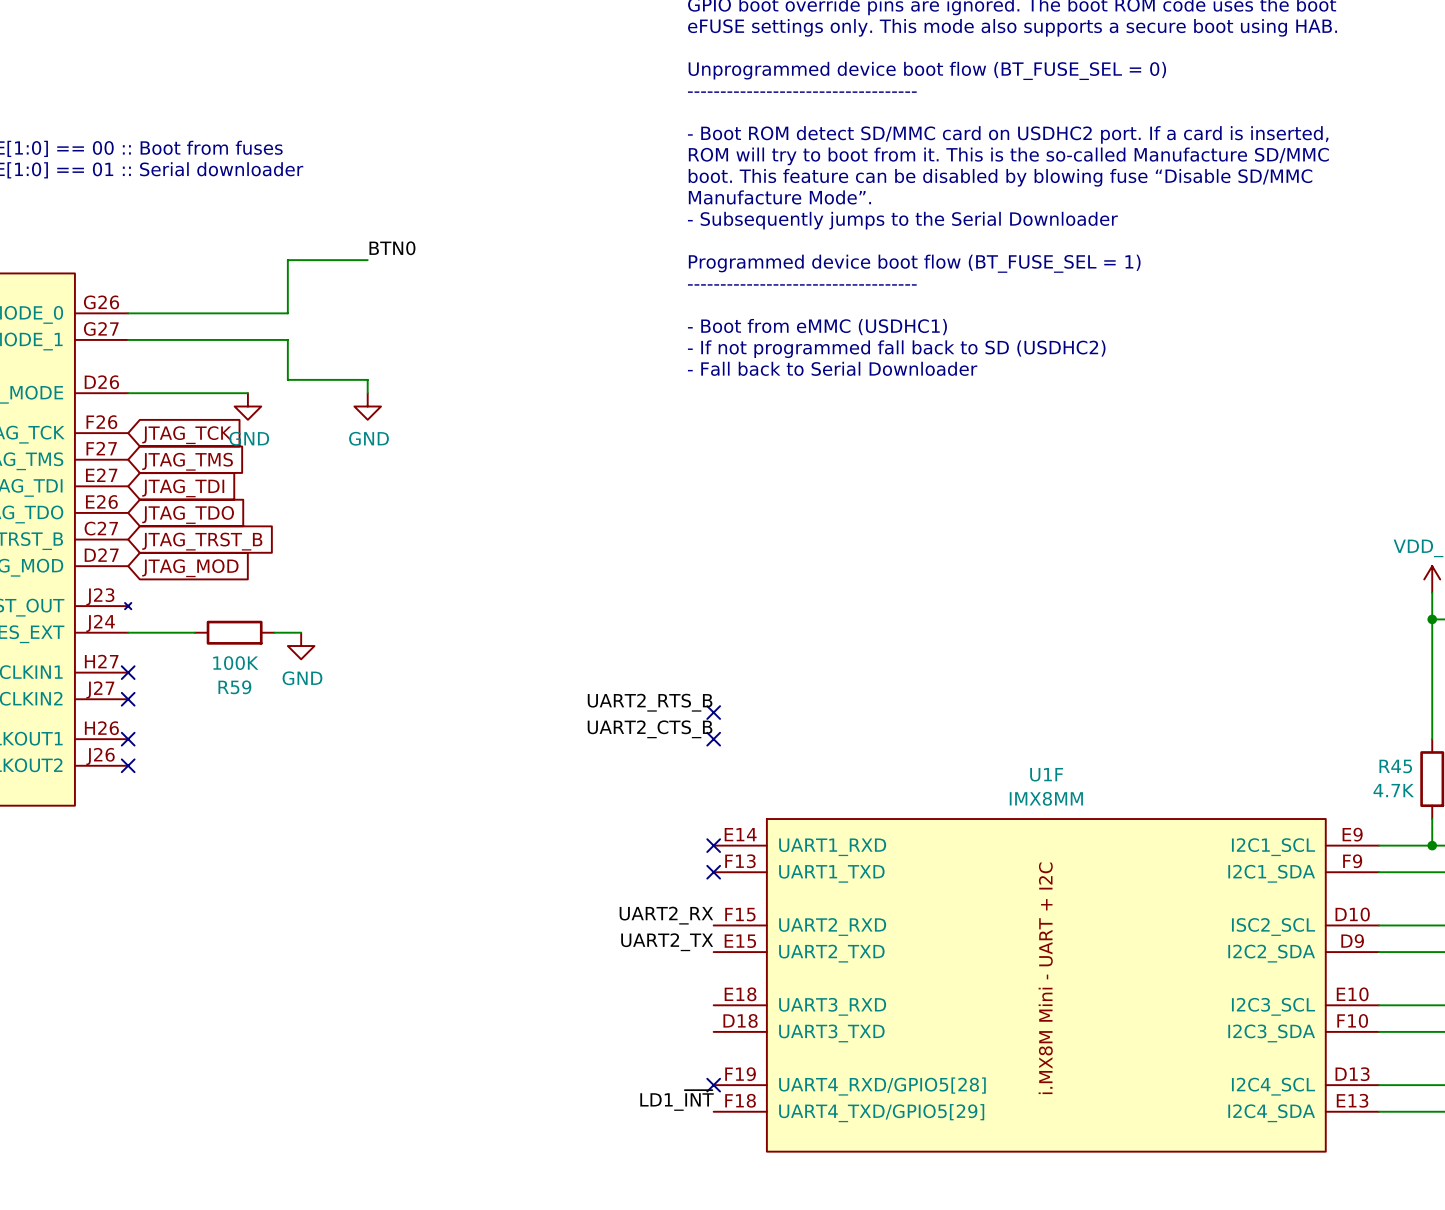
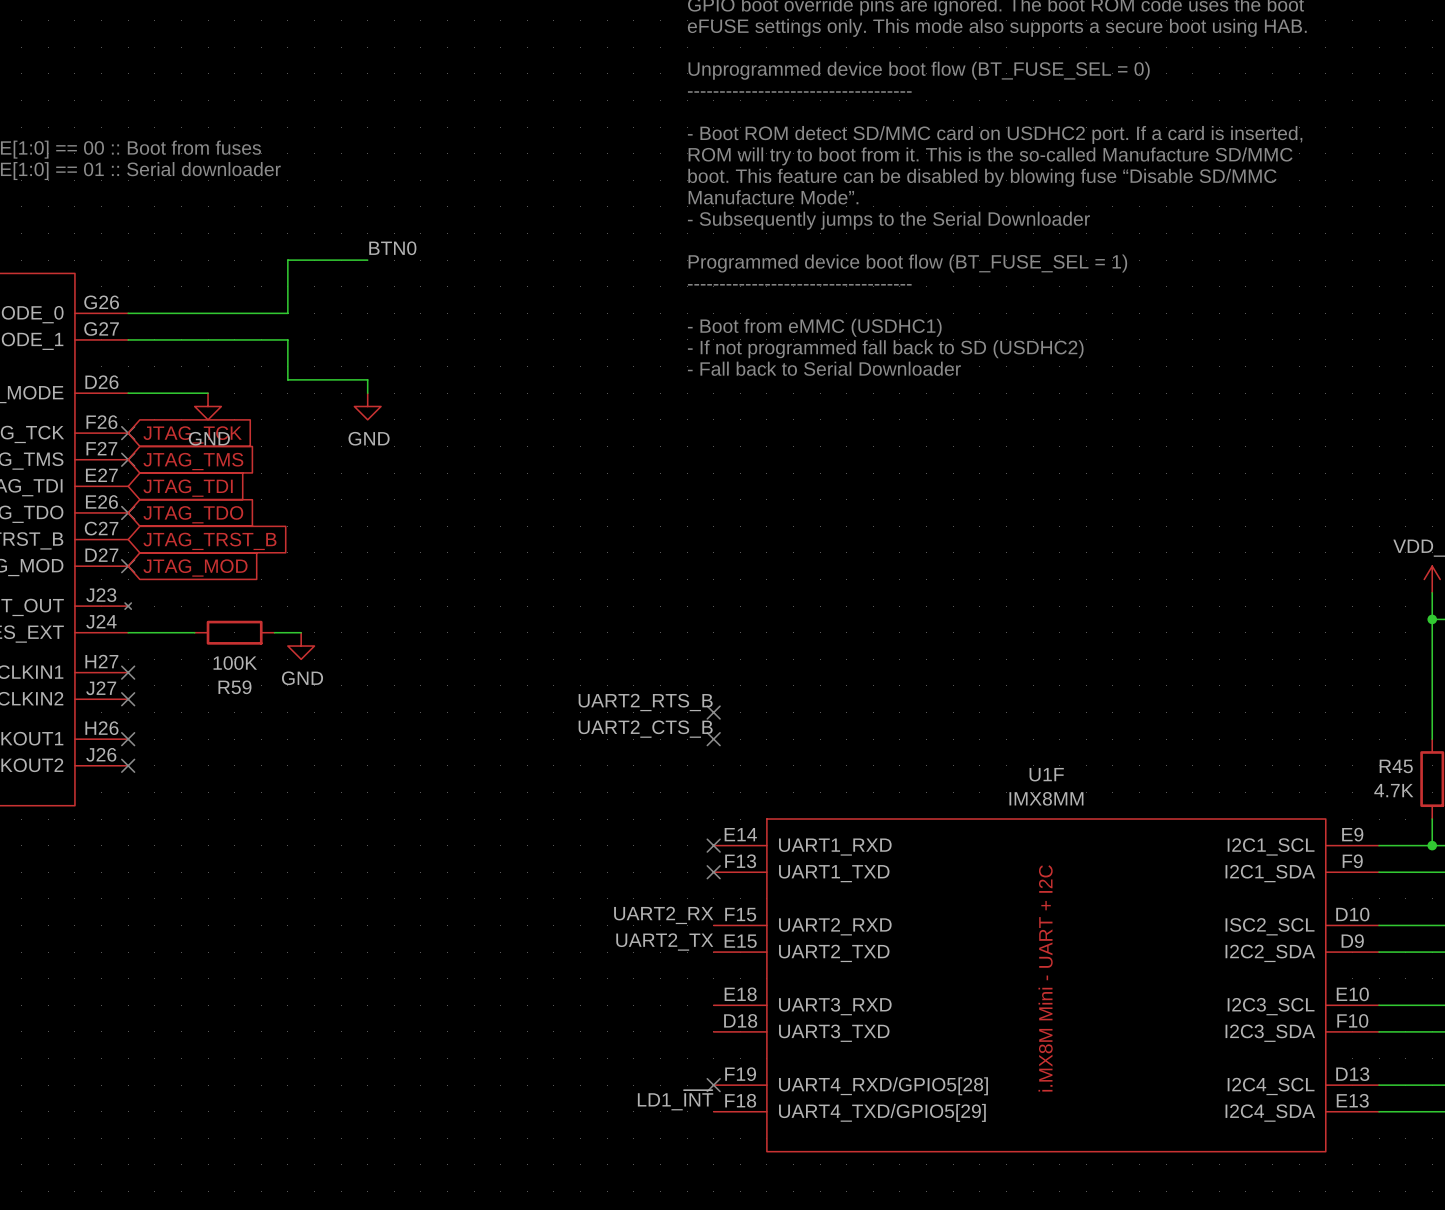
wire: (208, 393) (247, 393) -> none
power symbol position: GND (247, 406) -> GND (208, 406)
no-connect mark: none -> (128, 433)
no-connect mark: none -> (128, 459)
no-connect mark: none -> (128, 512)
no-connect mark: none -> (128, 566)

